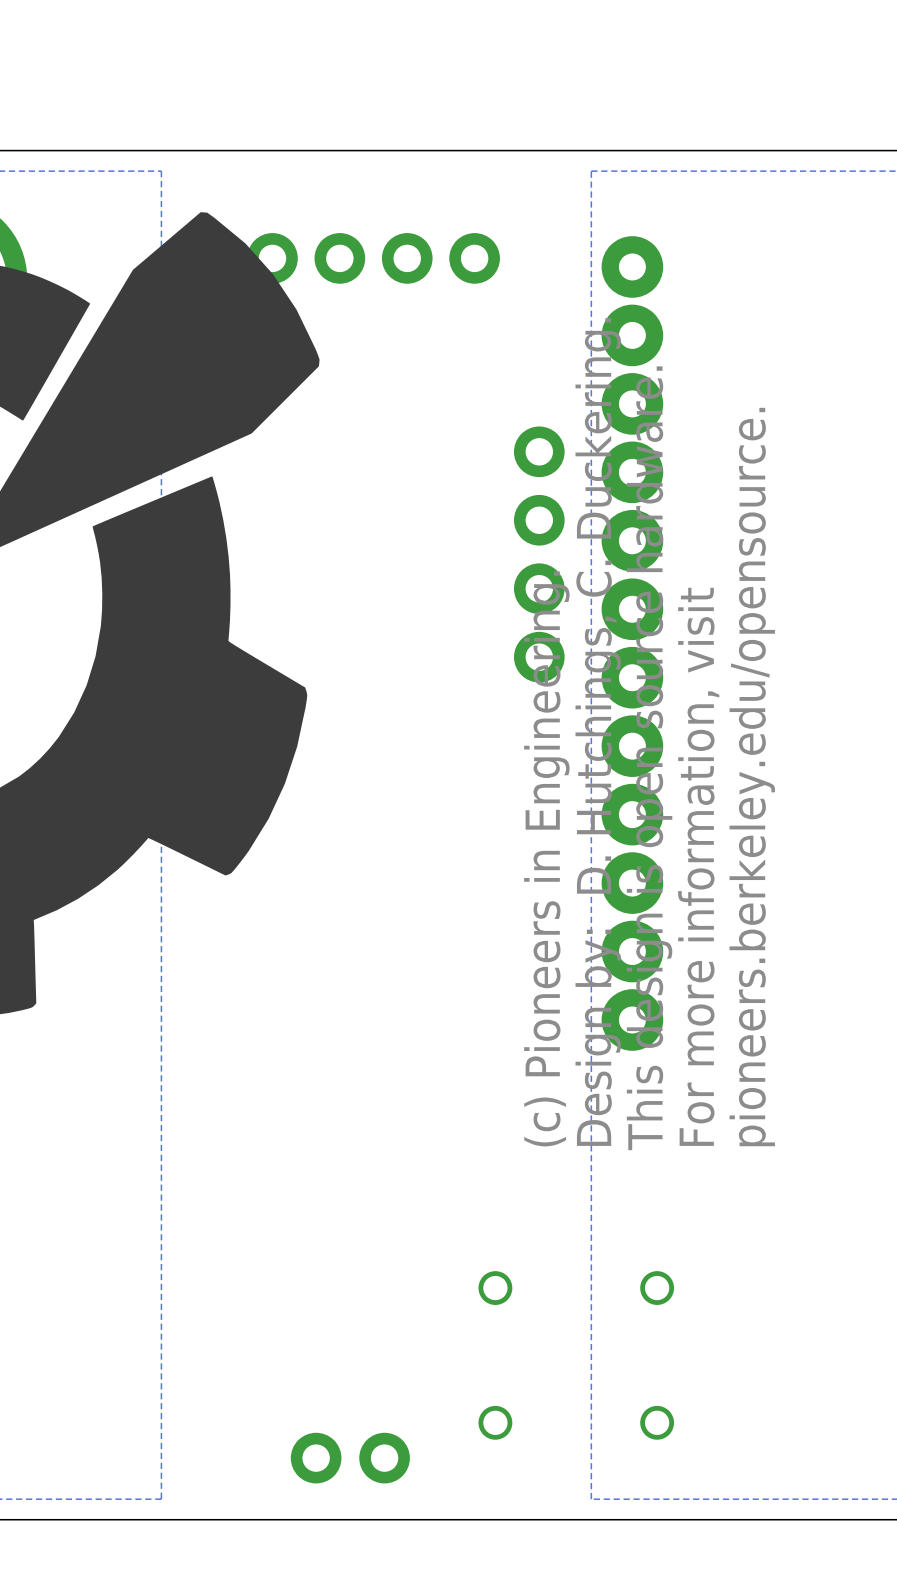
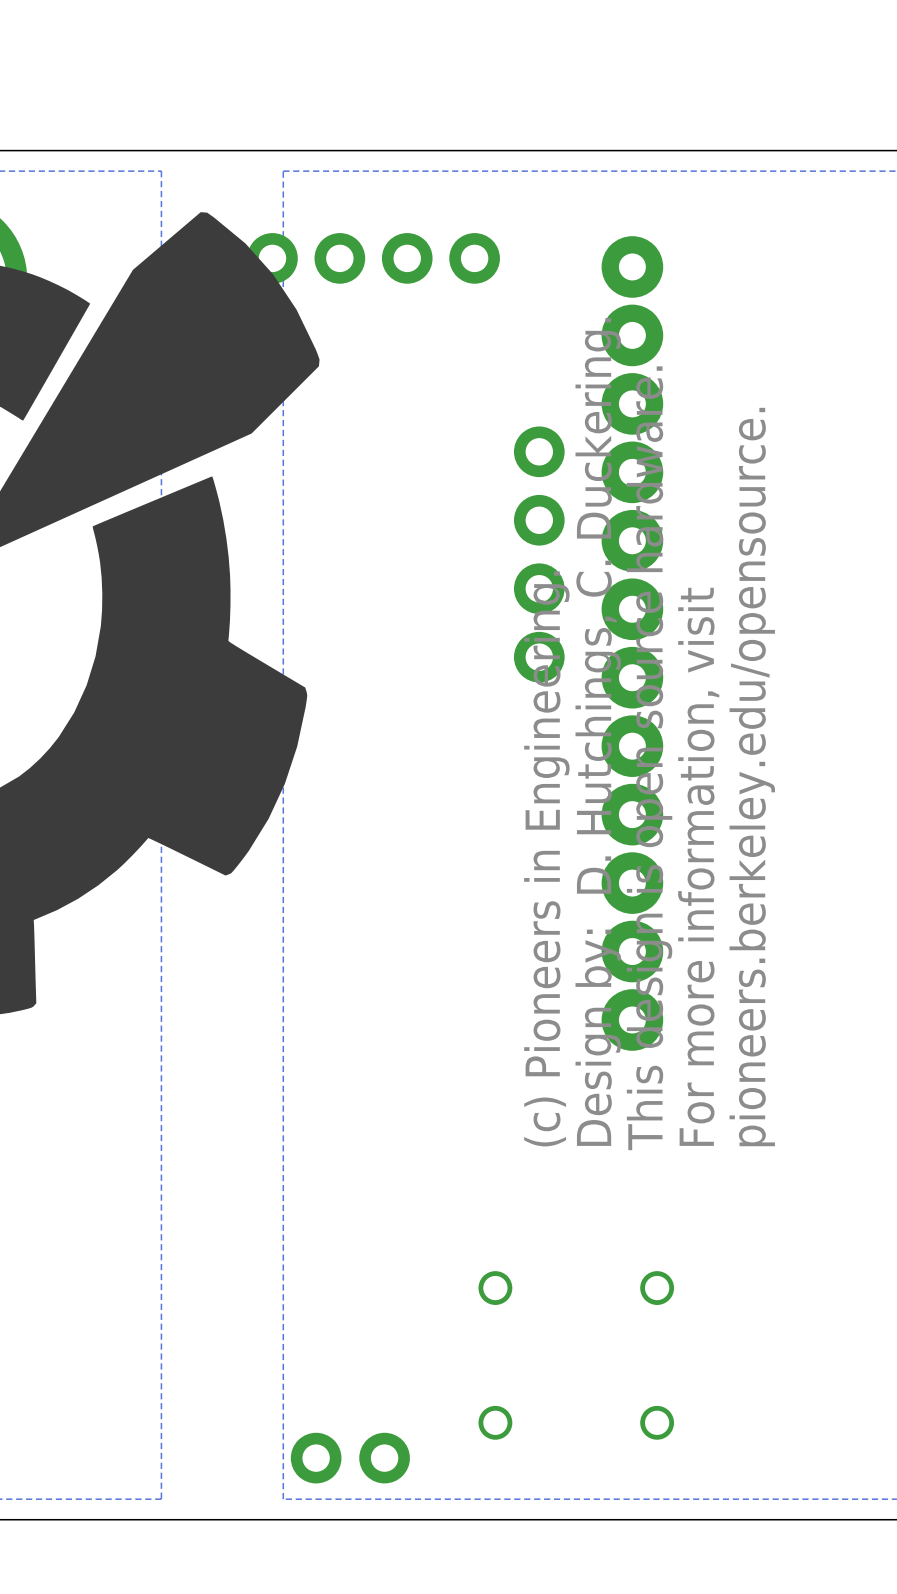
zone outline: (591, 171) (591, 1499) -> (591, 171) (283, 171) (283, 1499) (591, 1499)

